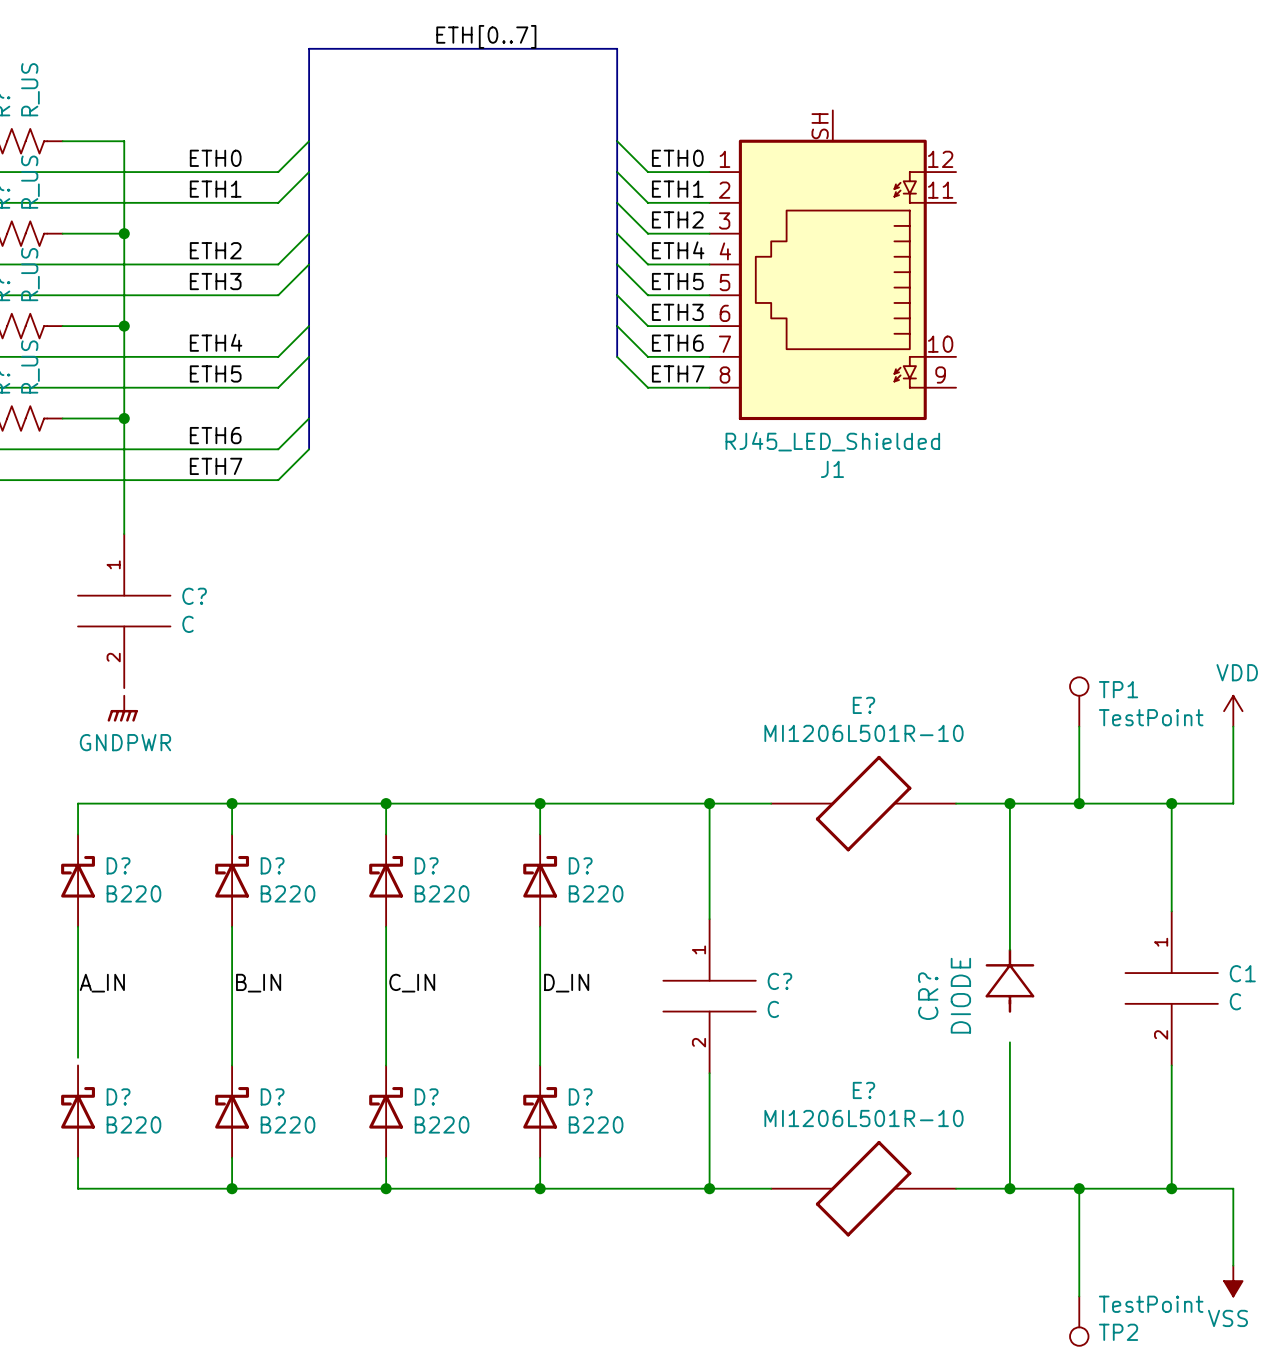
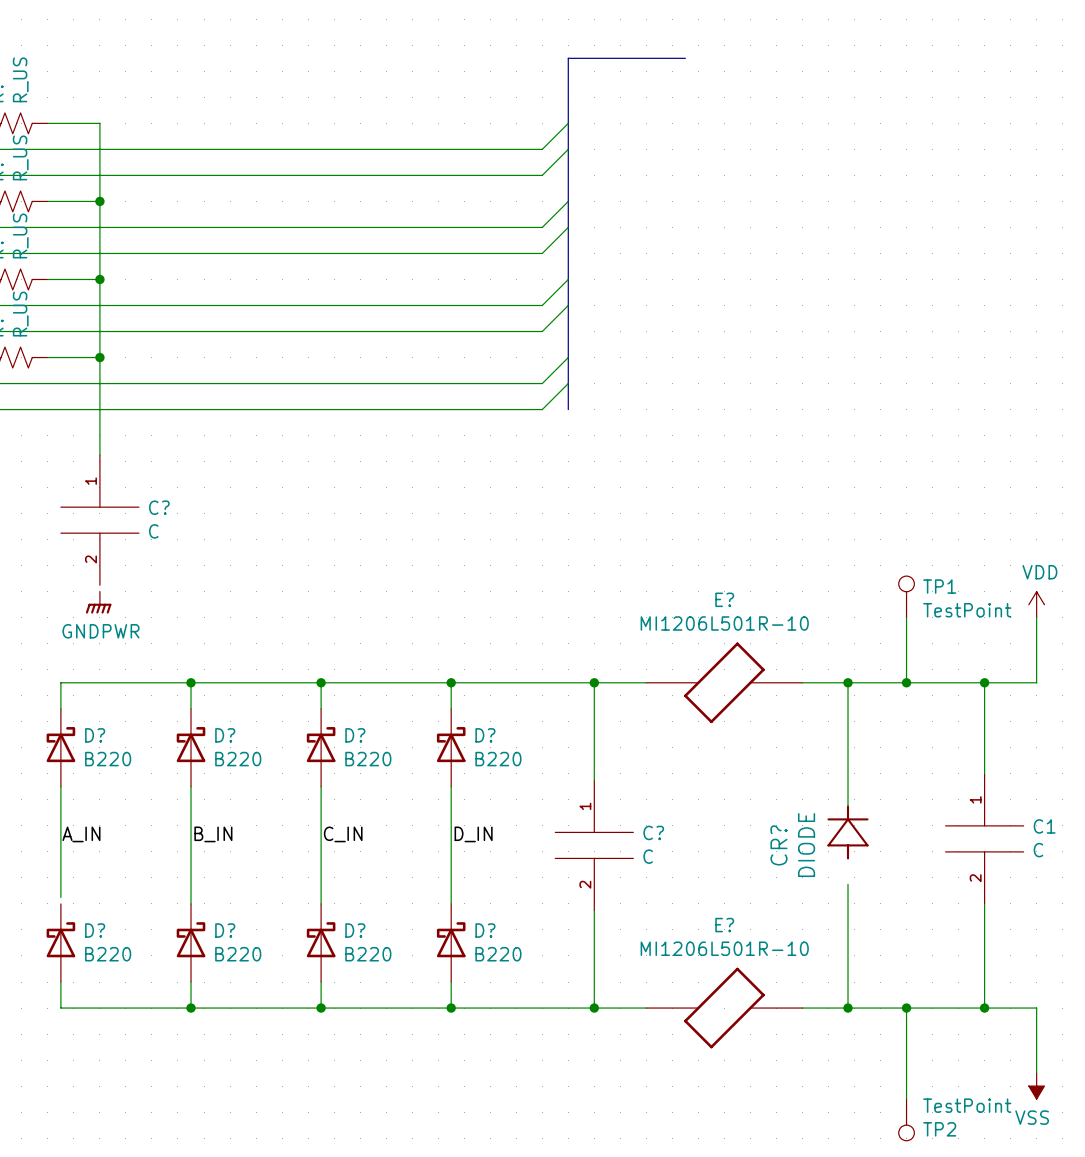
label: ETH[0..7] (486, 36) -> none
bus: none -> (685, 58) (568, 58) (568, 409)
wire: (309, 141) (278, 172) -> (568, 123) (542, 149) (230, 149)
wire: (617, 141) (647, 172) (709, 172) -> none
label: ETH0 (215, 158) -> none
label: ETH0 (677, 158) -> none
wire: (309, 172) (278, 202) -> (568, 149) (542, 175) (230, 175)
wire: (617, 172) (647, 202) (709, 202) -> none
label: ETH1 (215, 189) -> none
label: ETH1 (677, 189) -> none
wire: (617, 202) (647, 233) (709, 233) -> none
label: ETH2 (677, 219) -> none
wire: (309, 233) (278, 264) -> (568, 201) (542, 227) (230, 227)
wire: (617, 233) (647, 264) (709, 264) -> none
label: ETH2 (215, 250) -> none
label: ETH4 (678, 250) -> none
wire: (309, 264) (278, 295) -> (568, 227) (542, 253) (230, 253)
wire: (617, 264) (647, 295) (709, 295) -> none
J1: RJ45_LED_Shielded (832, 265) -> none
label: ETH3 (215, 281) -> none
label: ETH5 (677, 281) -> none
wire: (617, 295) (647, 326) (709, 326) -> none
label: ETH3 (677, 312) -> none
wire: (309, 326) (278, 356) -> (568, 279) (542, 305) (230, 305)
wire: (617, 326) (647, 356) (709, 356) -> none
label: ETH4 (216, 342) -> none
label: ETH6 (677, 343) -> none
wire: (309, 356) (278, 387) -> (568, 305) (542, 331) (230, 331)
wire: (617, 356) (647, 387) (709, 387) -> none
bus: (617, 356) (617, 48) (309, 48) (309, 449) -> none
label: ETH5 (215, 373) -> none
label: ETH7 (678, 373) -> none
wire: (309, 418) (278, 449) -> (568, 357) (542, 383) (230, 383)
label: ETH6 (215, 435) -> none
wire: (309, 449) (278, 480) -> (568, 383) (542, 409) (230, 409)
label: ETH7 (216, 466) -> none

